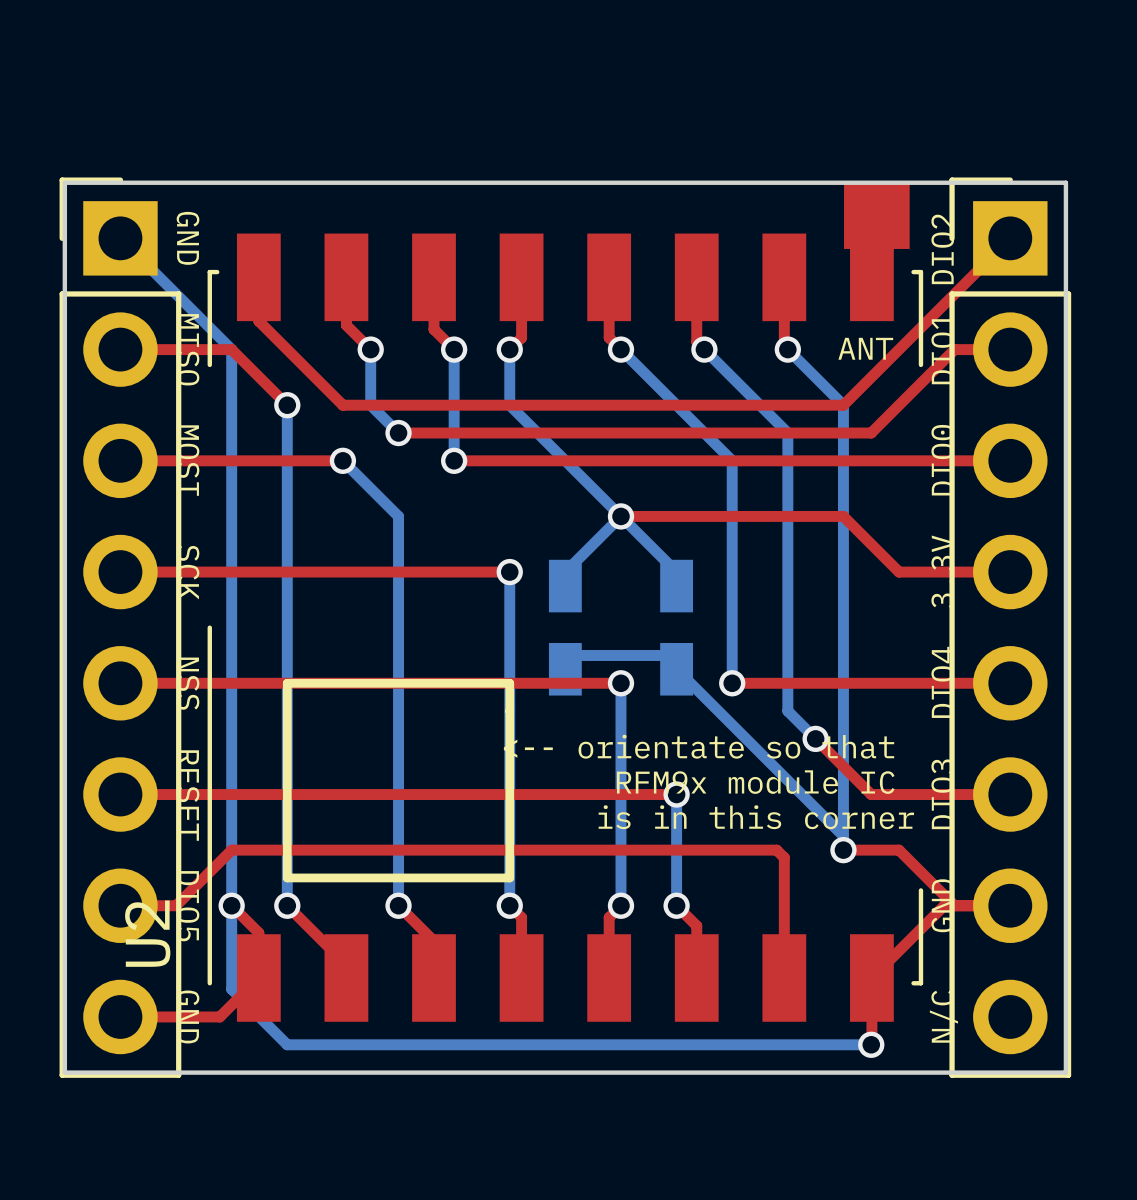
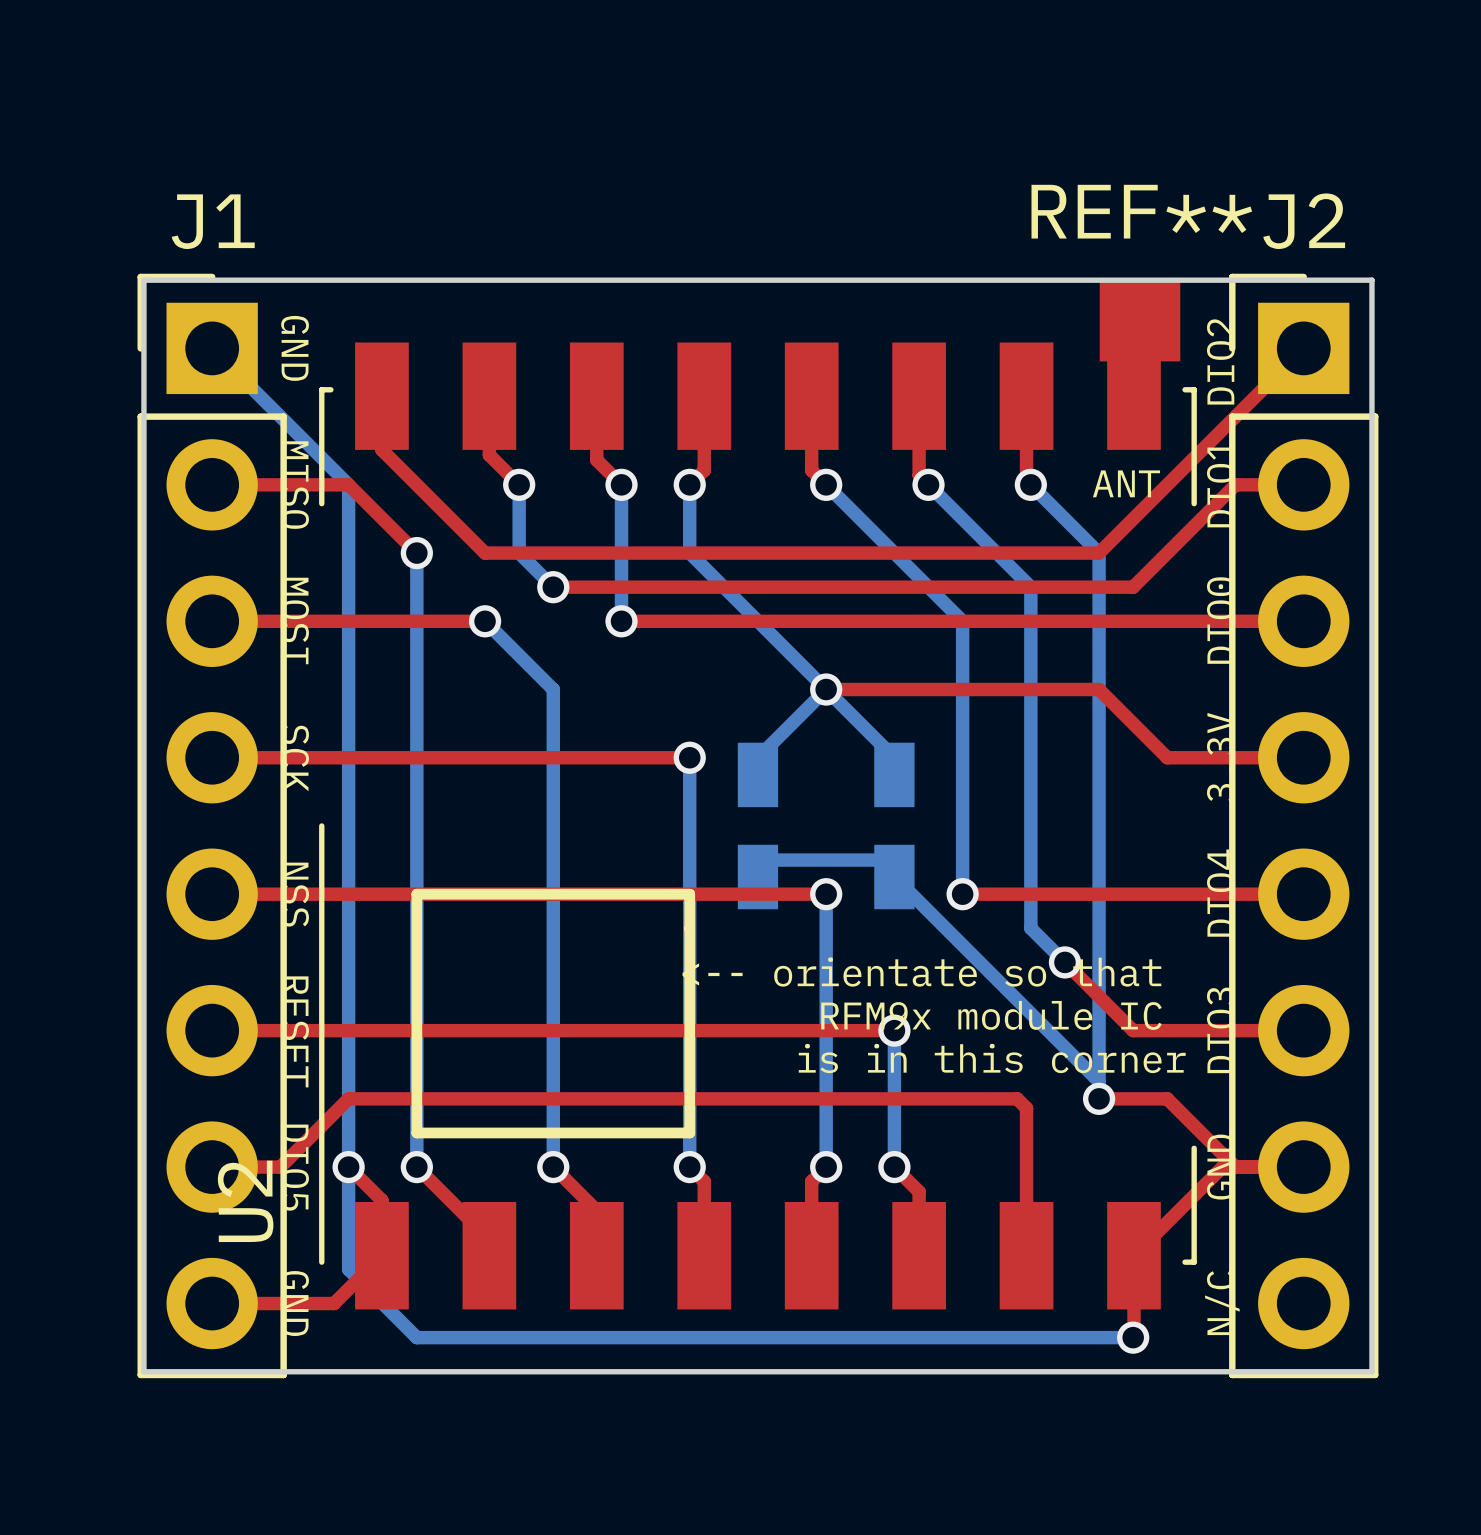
REF** name: none -> REF** (1141, 211)
J2 name: none -> J2 (1304, 221)
J1 name: none -> J1 (213, 221)

